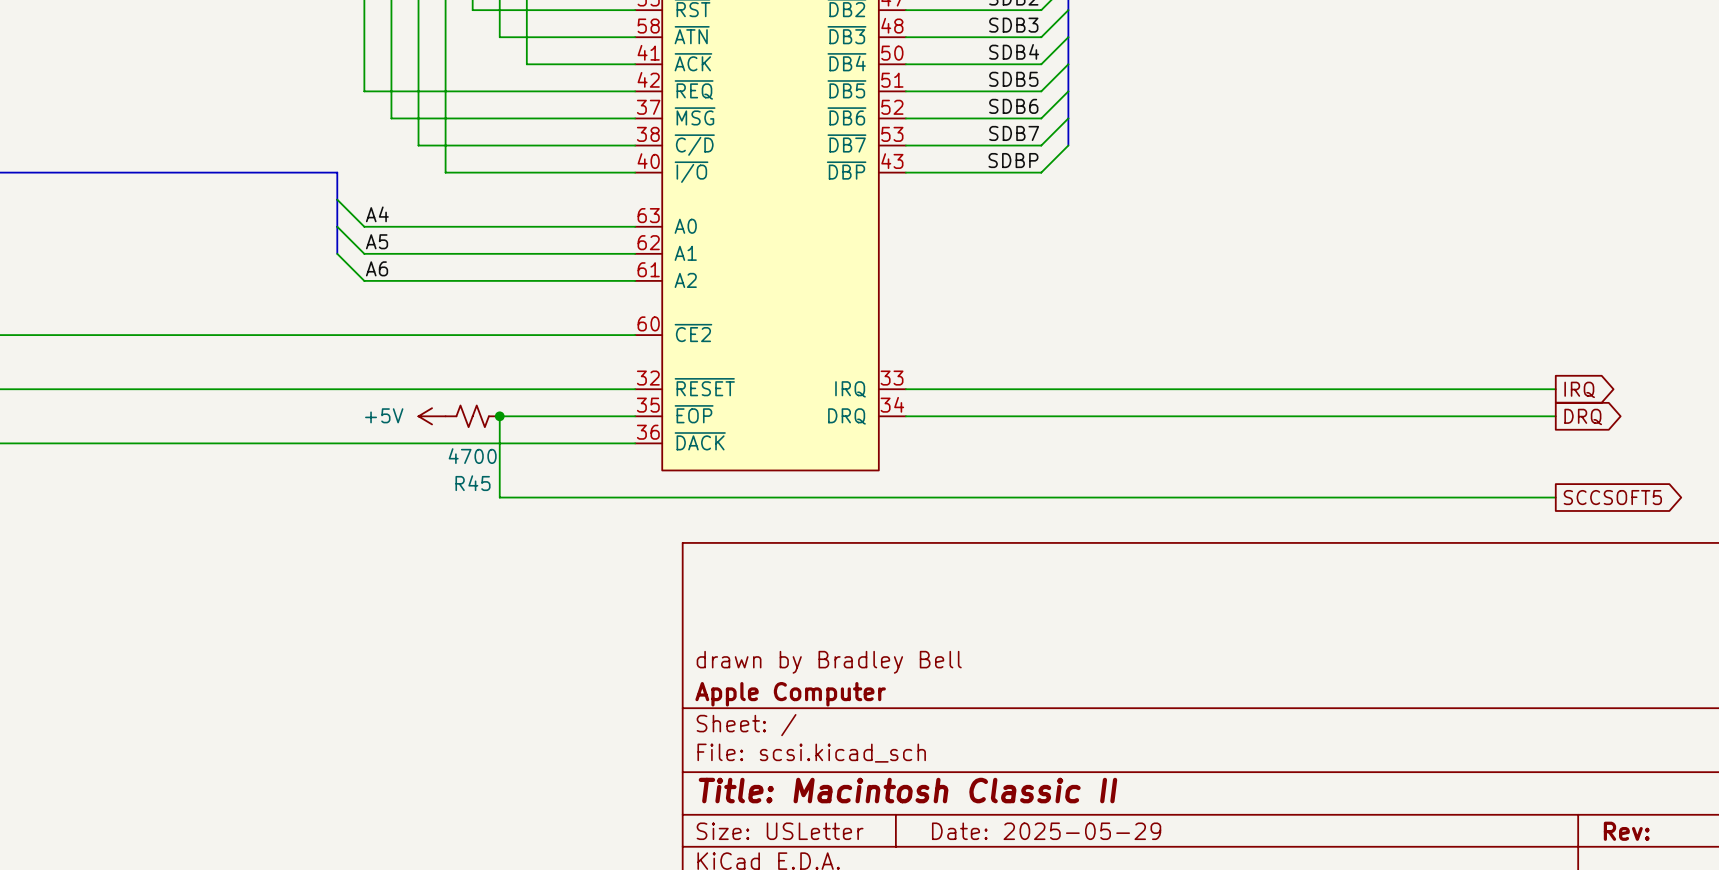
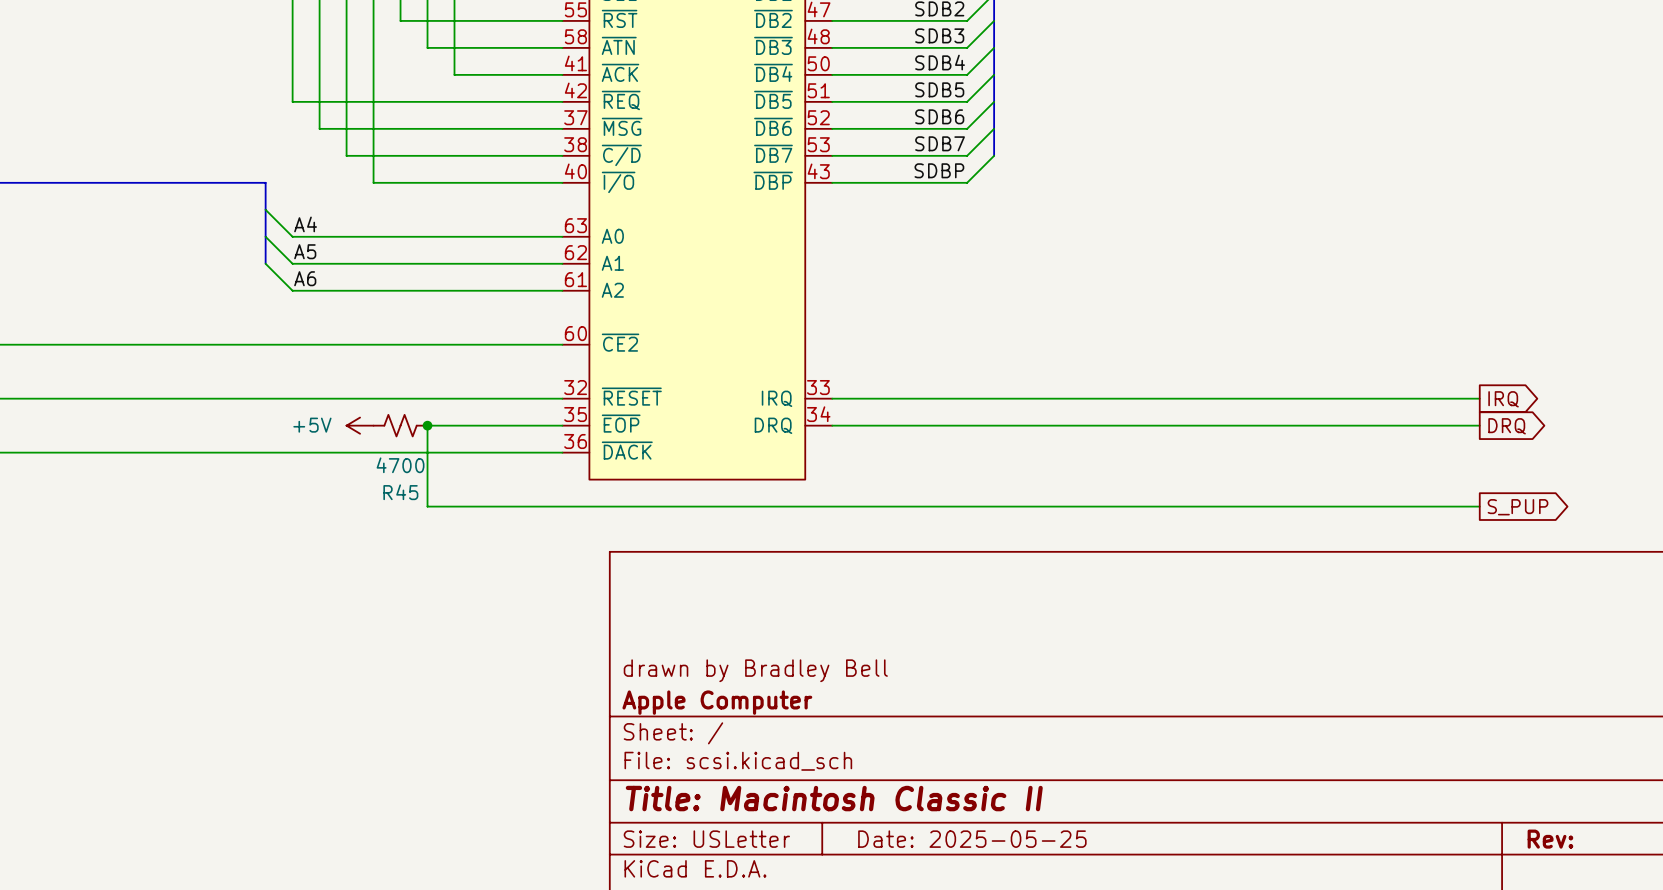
global label: SCCSOFT5 (1612, 497) -> S_PUP (1518, 507)
title block: Date: 2025-05-29 (1046, 831) -> Date: 2025-05-25 (972, 839)

